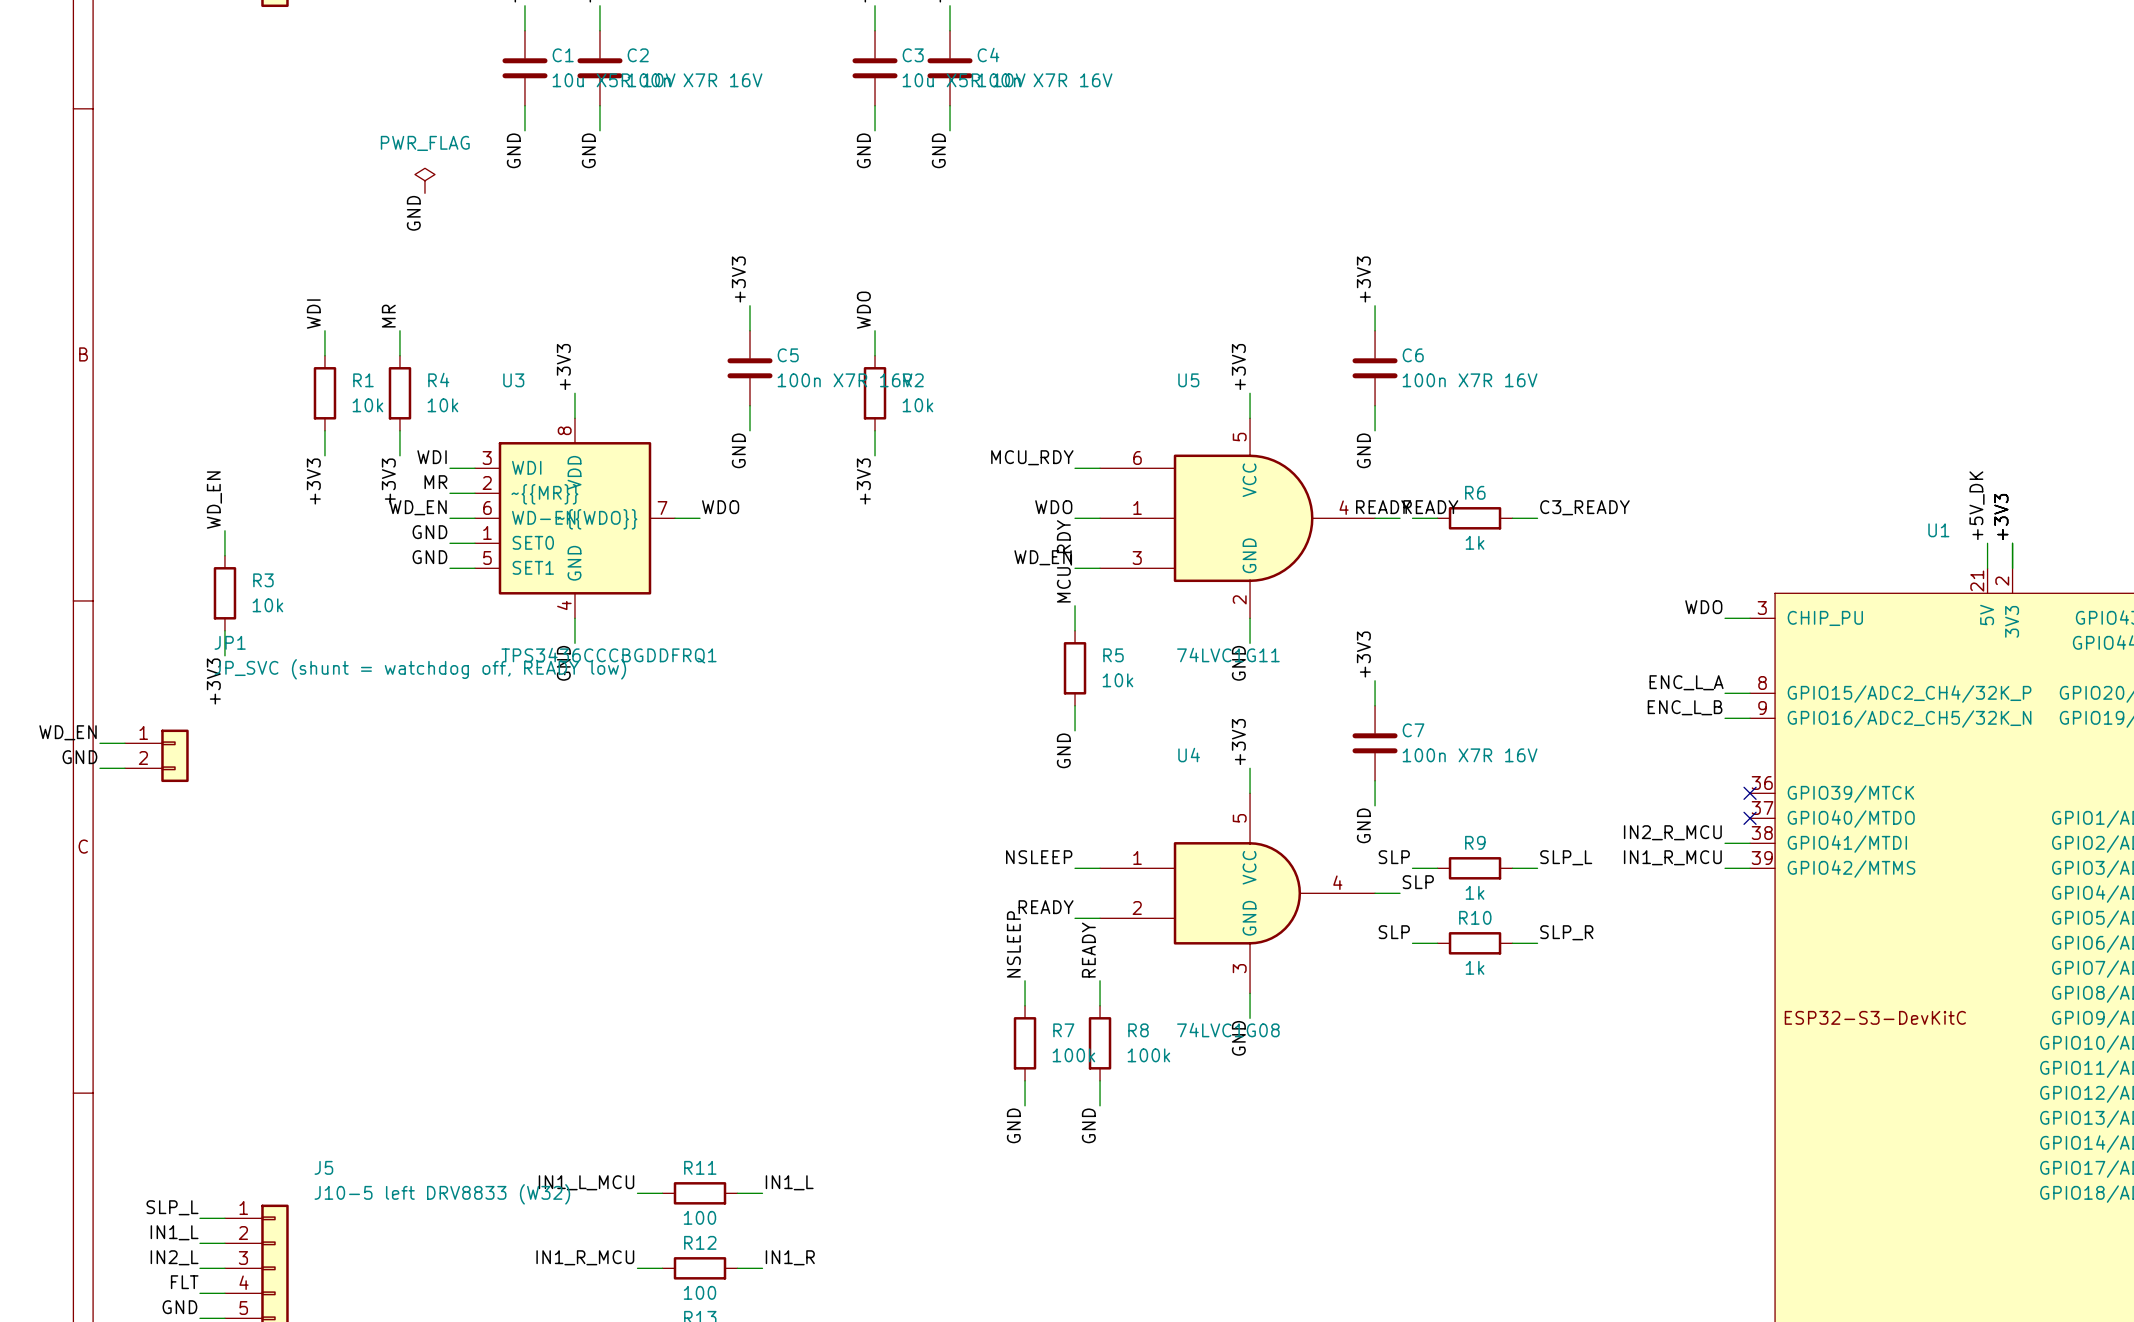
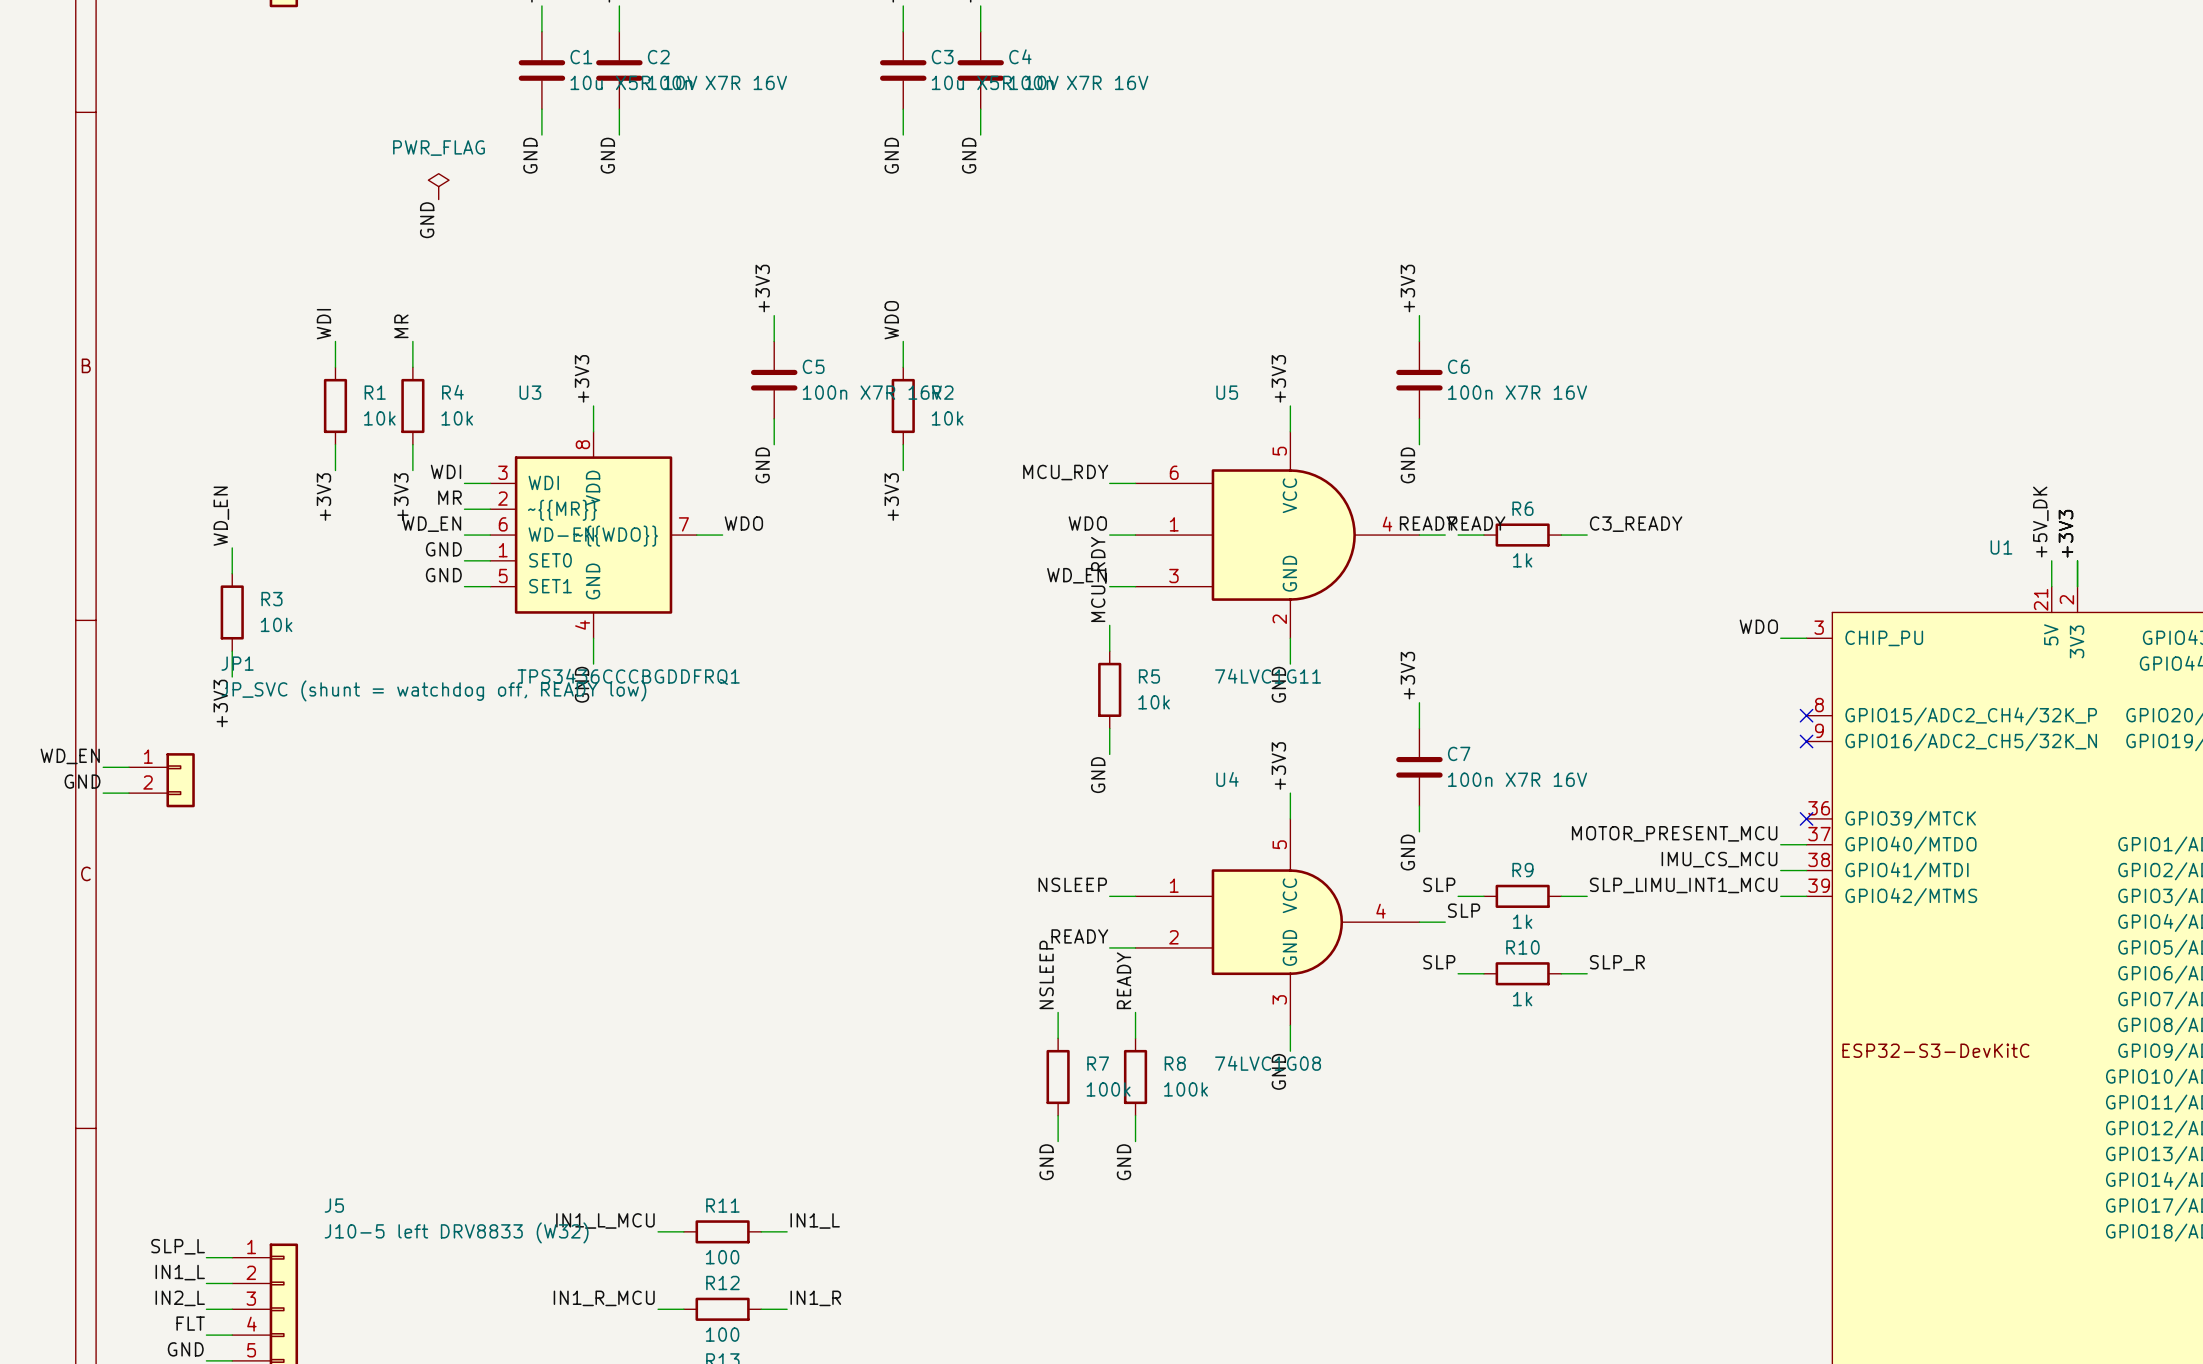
label: ENC_L_A (1686, 682) -> none
wire: (1725, 693) (1750, 693) -> none
no-connect mark: none -> (1806, 715)
label: ENC_L_B (1685, 707) -> none
wire: (1725, 718) (1750, 718) -> (1780, 844) (1806, 844)
no-connect mark: none -> (1806, 741)
label: none -> MOTOR_PRESENT_MCU (1674, 833)
no-connect mark: (1750, 818) -> none
label: IN2_R_MCU (1672, 832) -> IMU_CS_MCU (1719, 859)
label: IN1_R_MCU (1672, 857) -> IMU_INT1_MCU (1711, 885)

